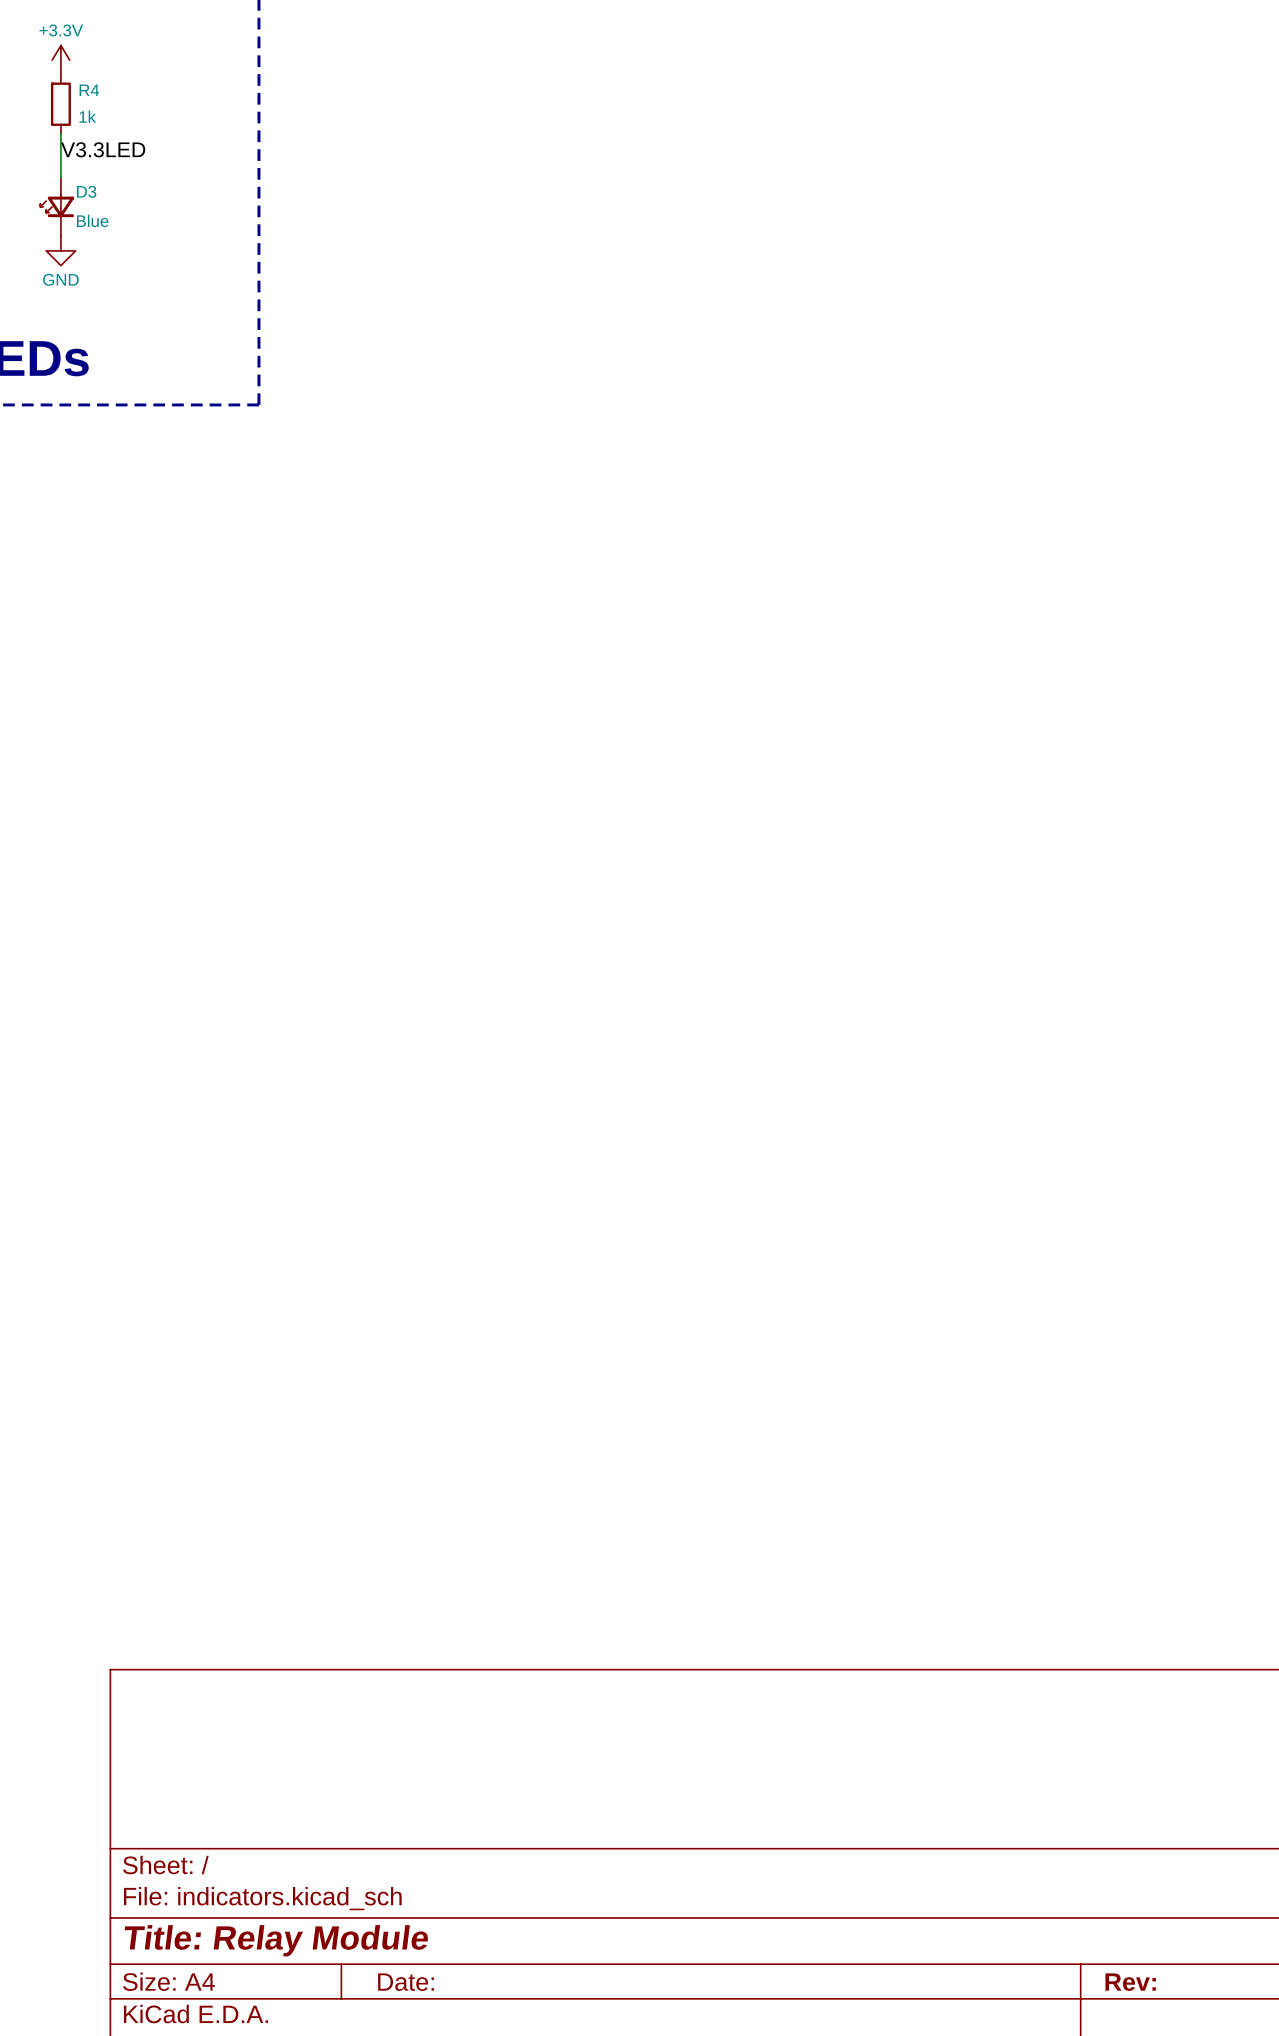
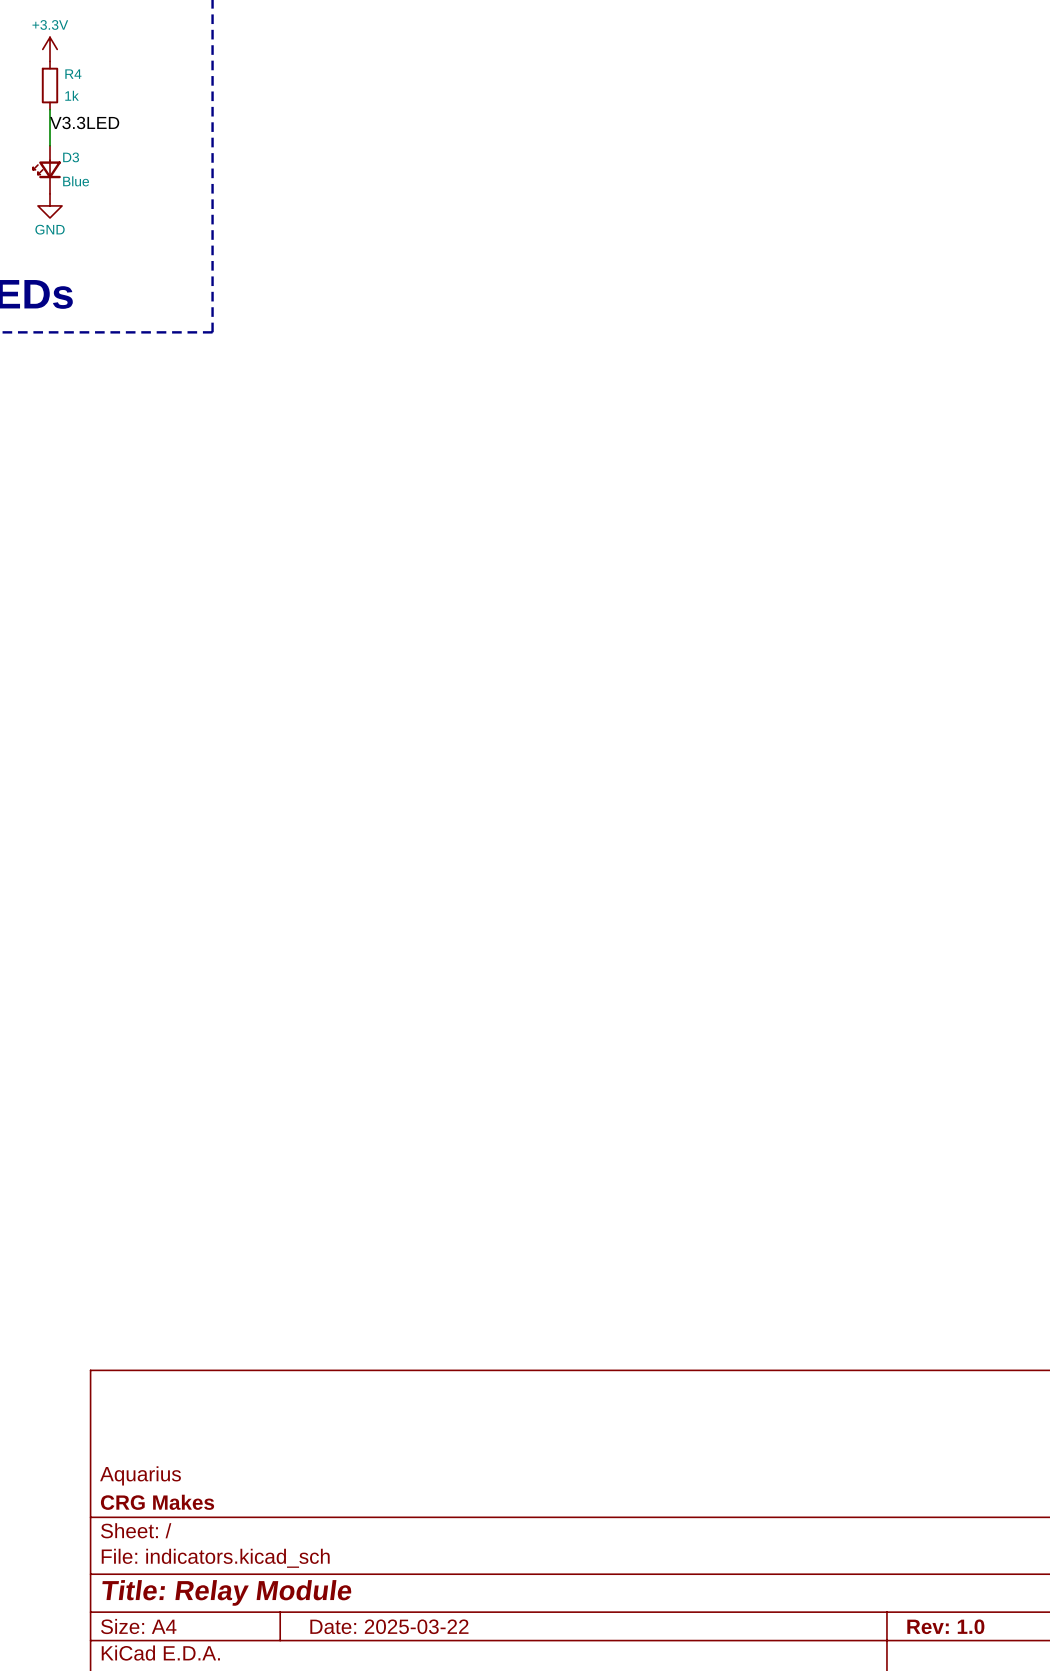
title block: none -> Aquarius (140, 1475)
title block: none -> CRG Makes (157, 1502)
title block: Date: (406, 1982) -> Date: 2025-03-22 (389, 1626)
title block: Rev: (1130, 1982) -> Rev: 1.0 (945, 1626)

